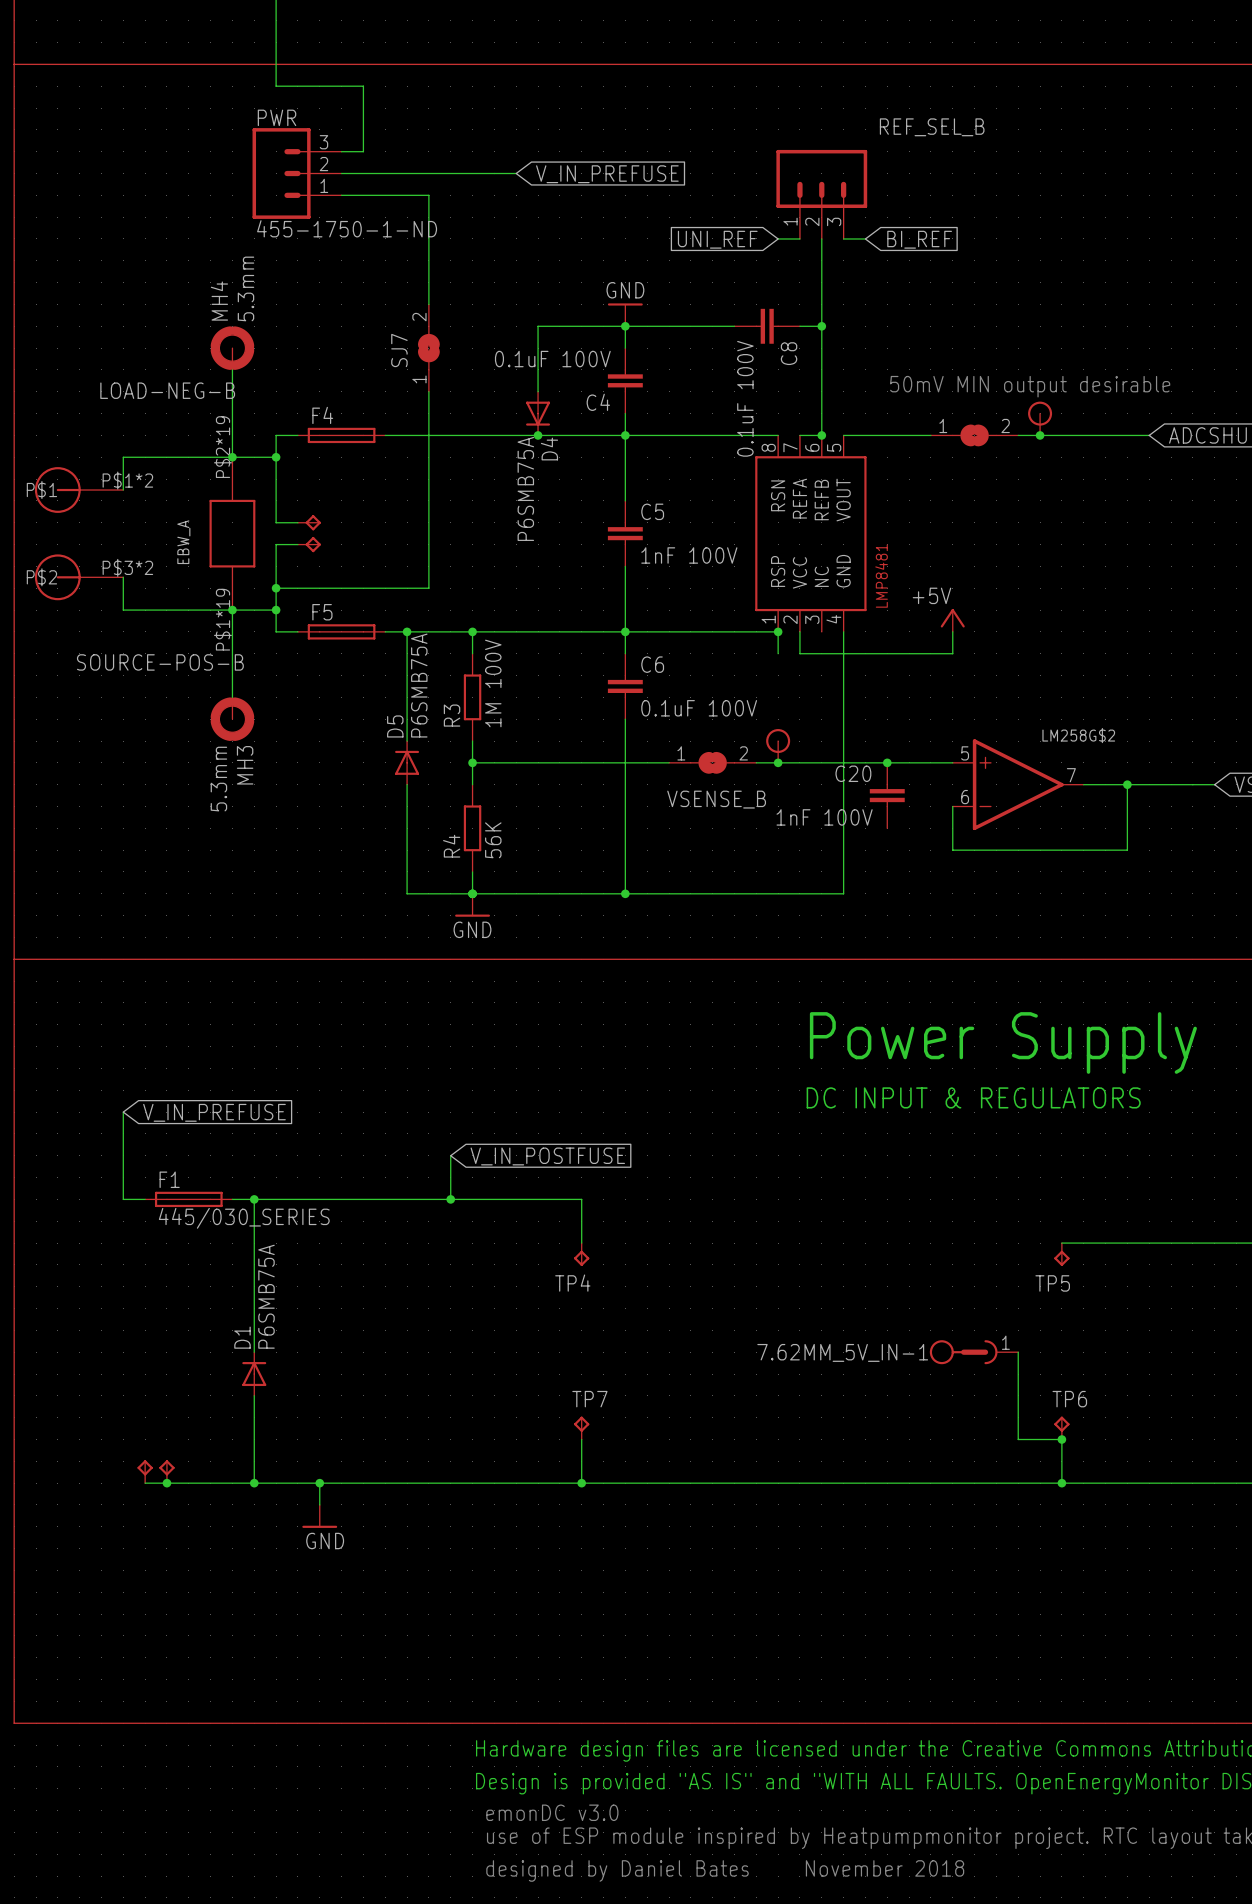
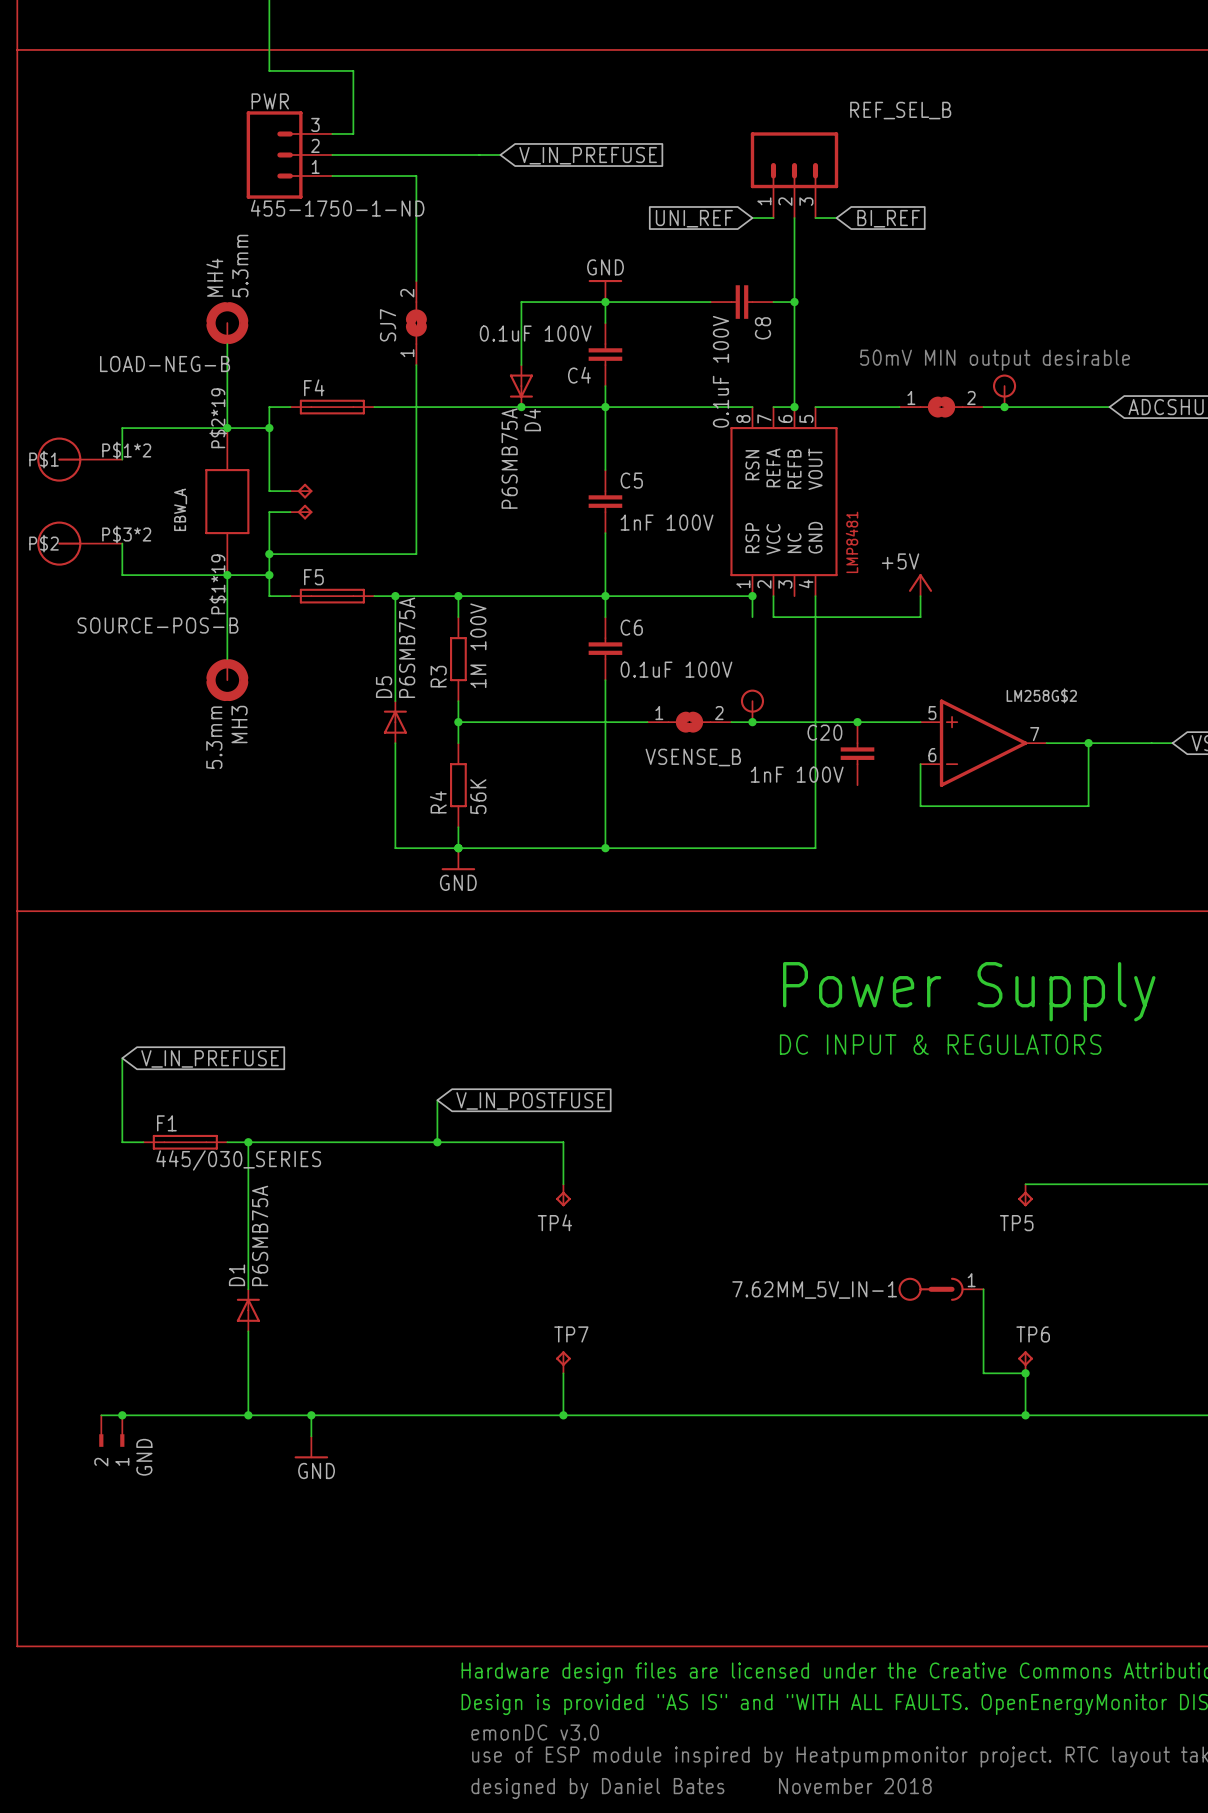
part: (145, 1471) -> none
part: (166, 1471) -> none
wire: none -> (101, 1415) (143, 1415)
junction position: (166, 1483) -> (122, 1415)
GND: none -> (111, 1431)

